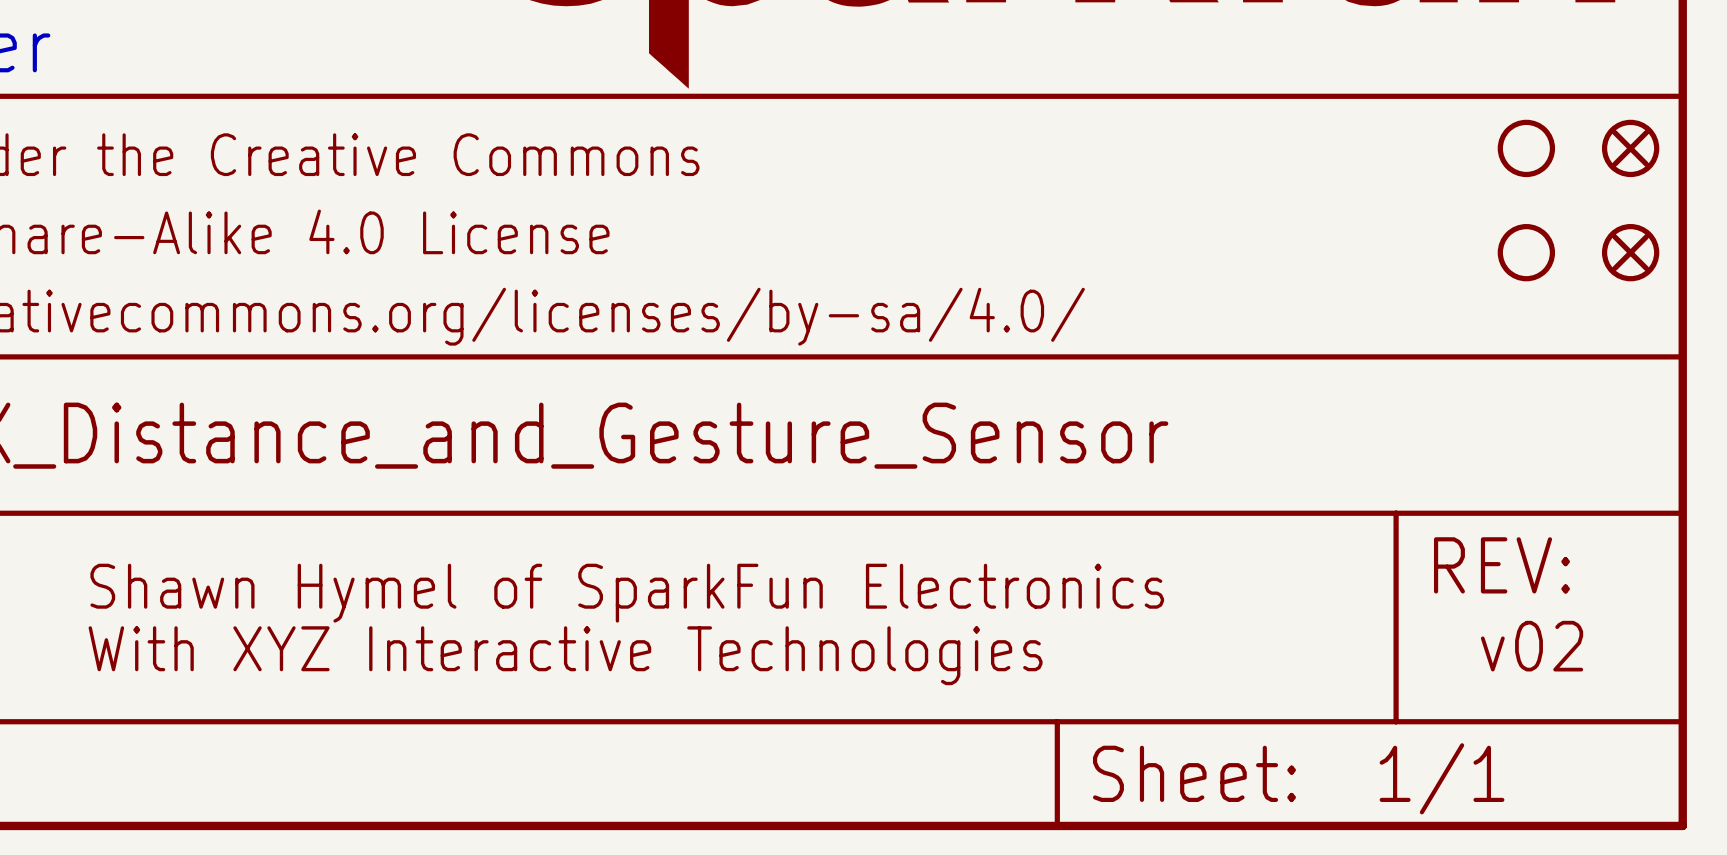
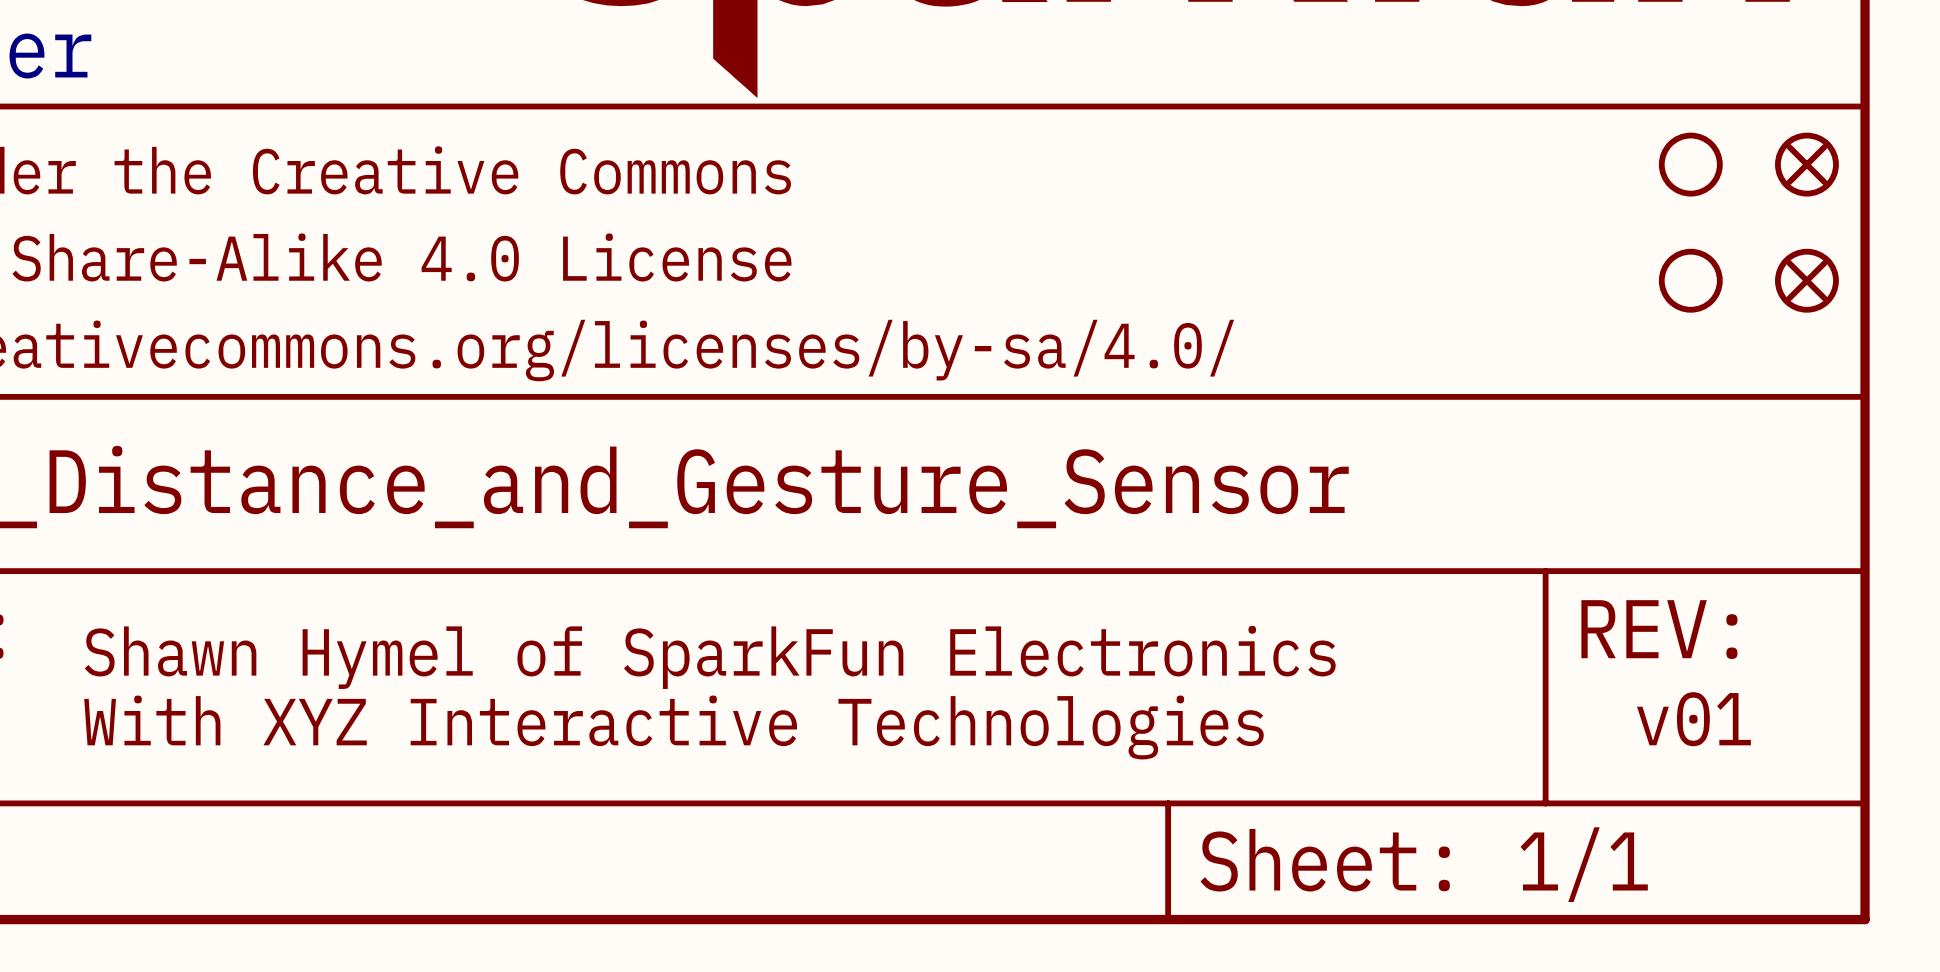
text: v02 (1532, 646) -> v01 (1693, 719)

